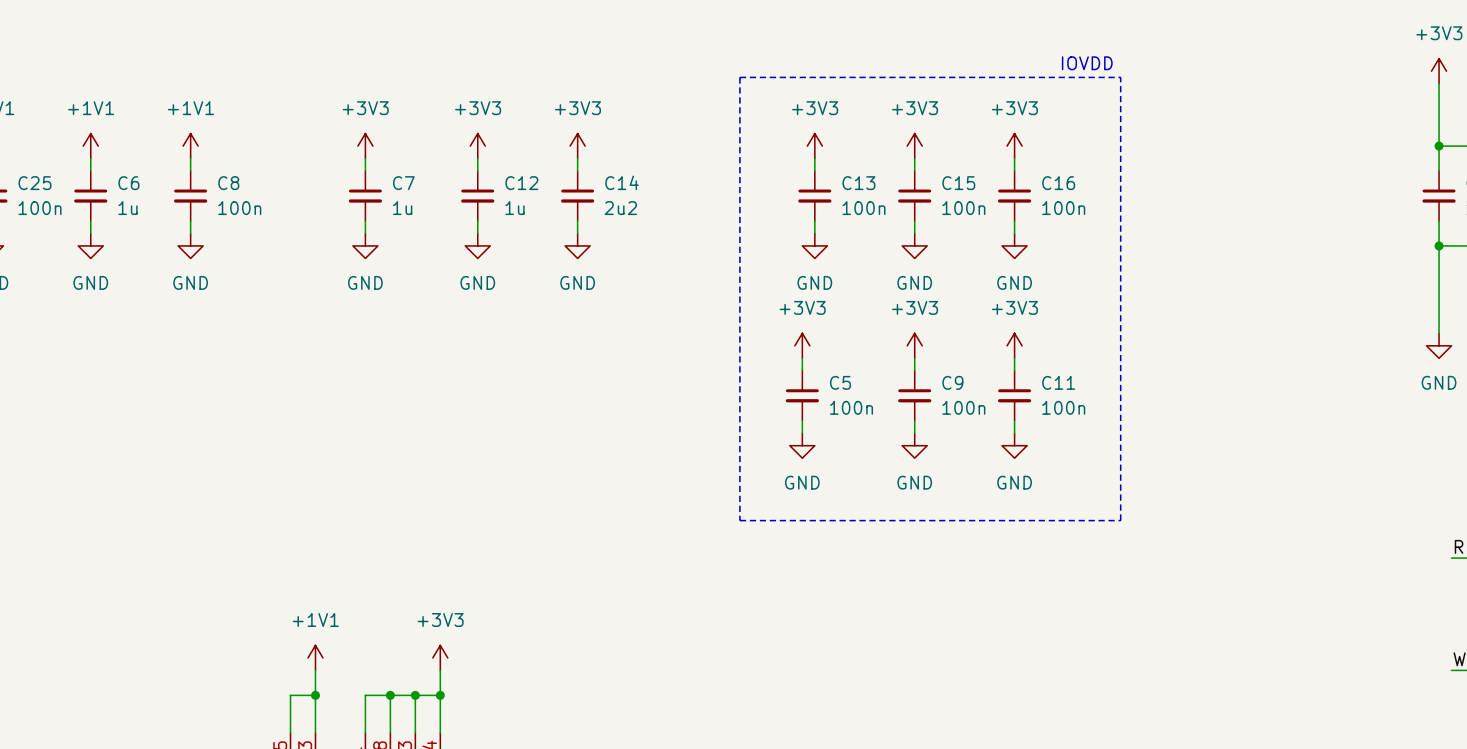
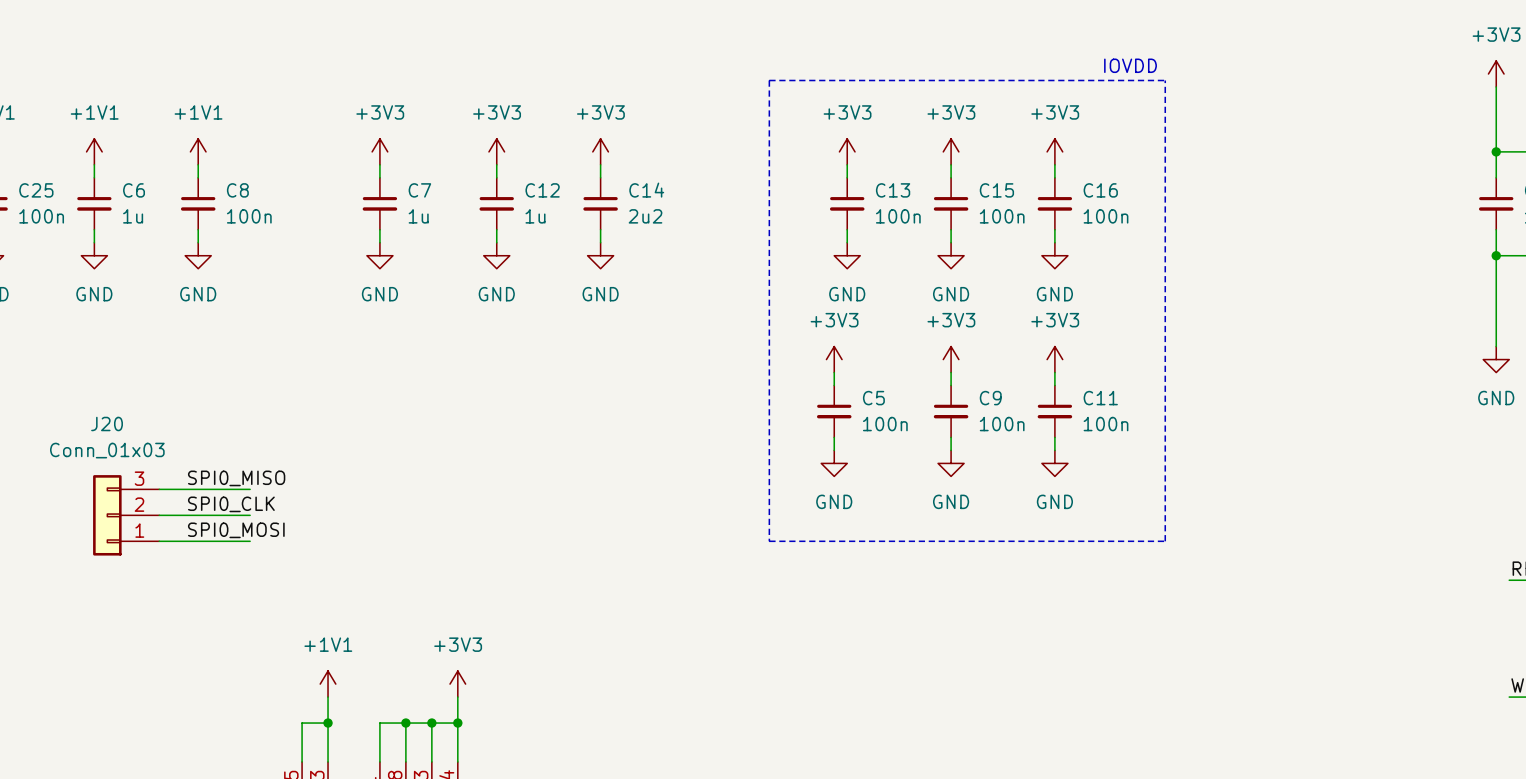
label: none -> SPI0_MISO (236, 478)
wire: none -> (159, 489) (250, 489)
label: none -> SPI0_CLK (231, 504)
J20: none -> Conn_01x03 (126, 515)
wire: none -> (159, 515) (250, 515)
label: none -> SPI0_MOSI (236, 530)
wire: none -> (159, 541) (250, 541)

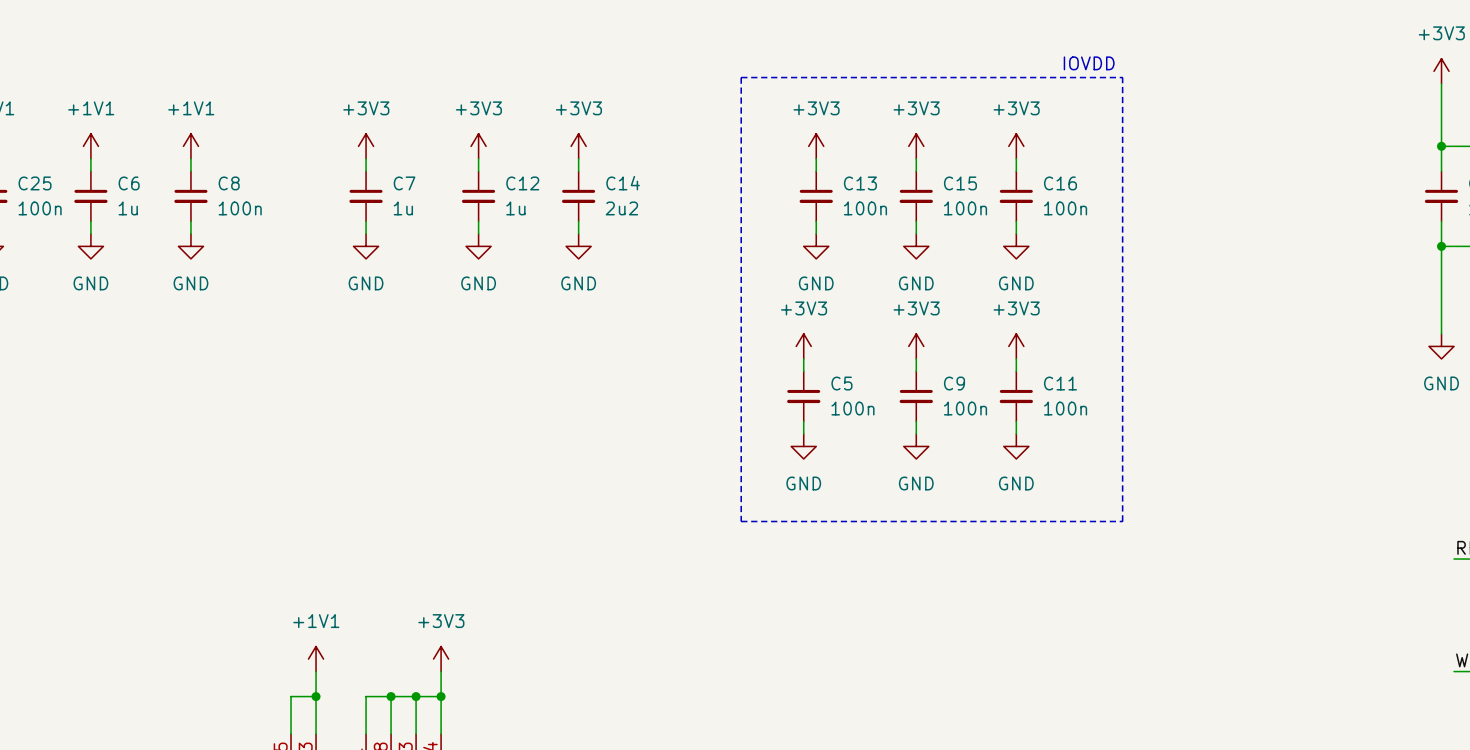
label: SPI0_MISO (236, 478) -> none
wire: (159, 489) (250, 489) -> none
label: SPI0_CLK (231, 504) -> none
J20: Conn_01x03 (126, 515) -> none
wire: (159, 515) (250, 515) -> none
label: SPI0_MOSI (236, 530) -> none
wire: (159, 541) (250, 541) -> none

